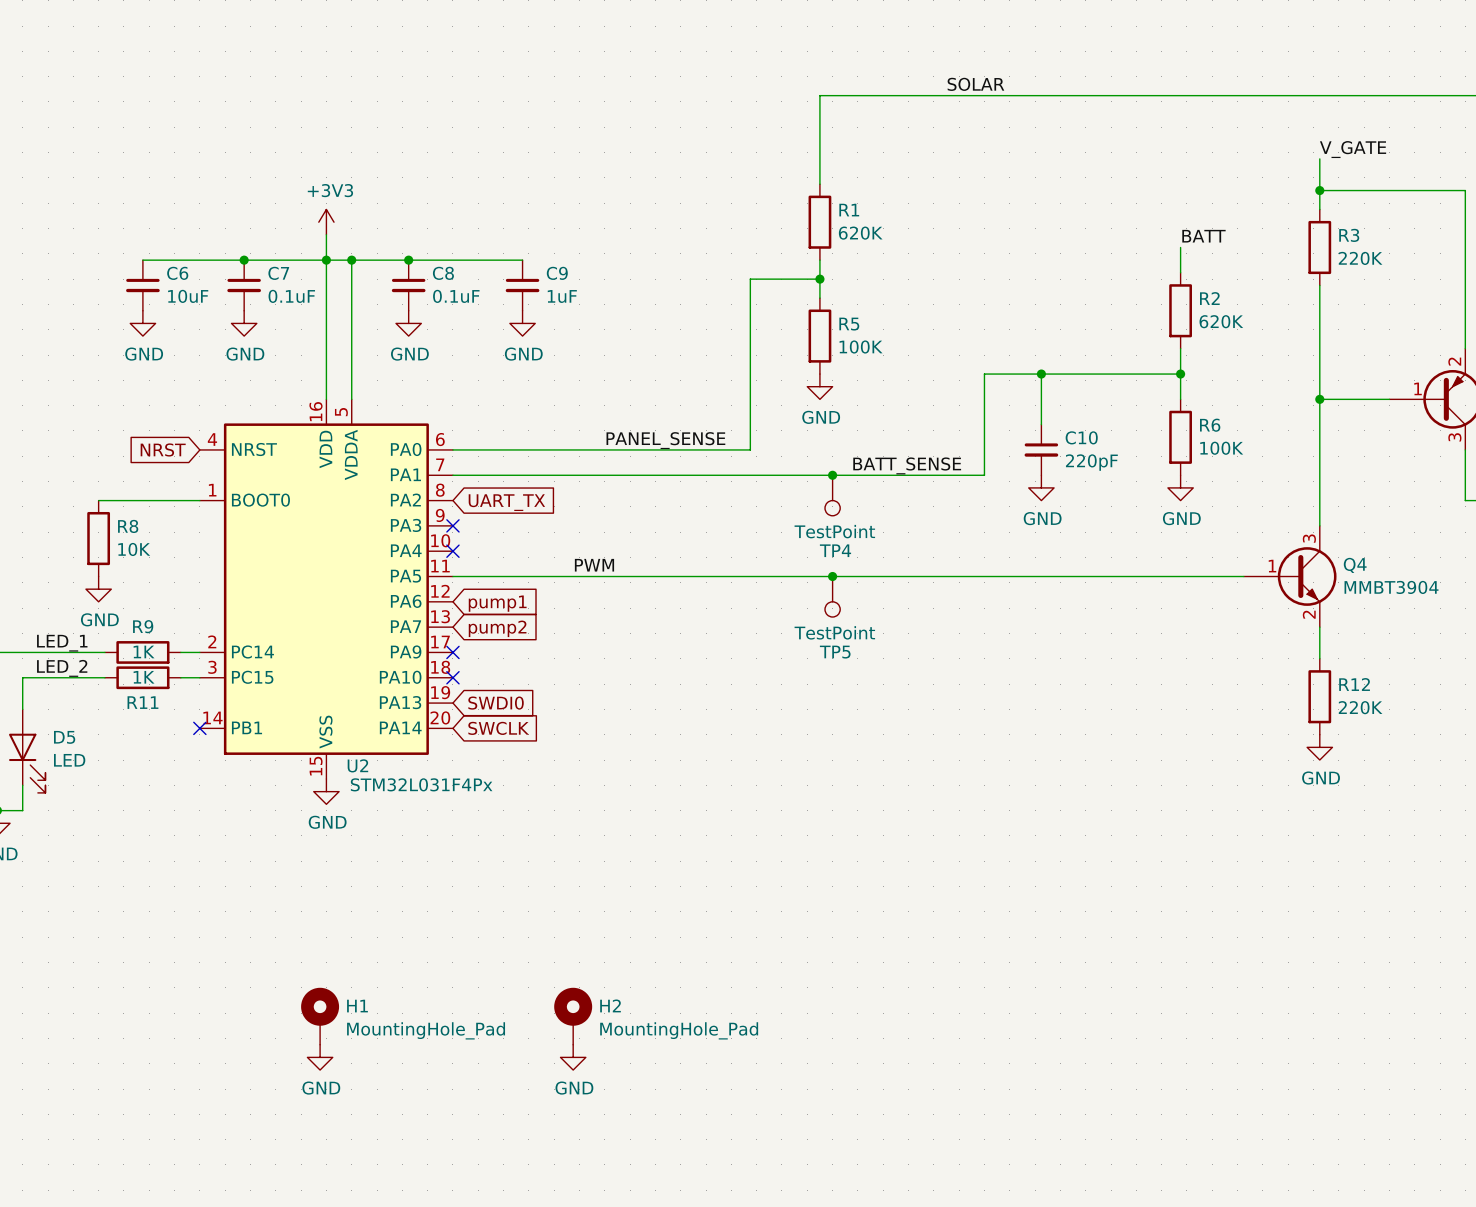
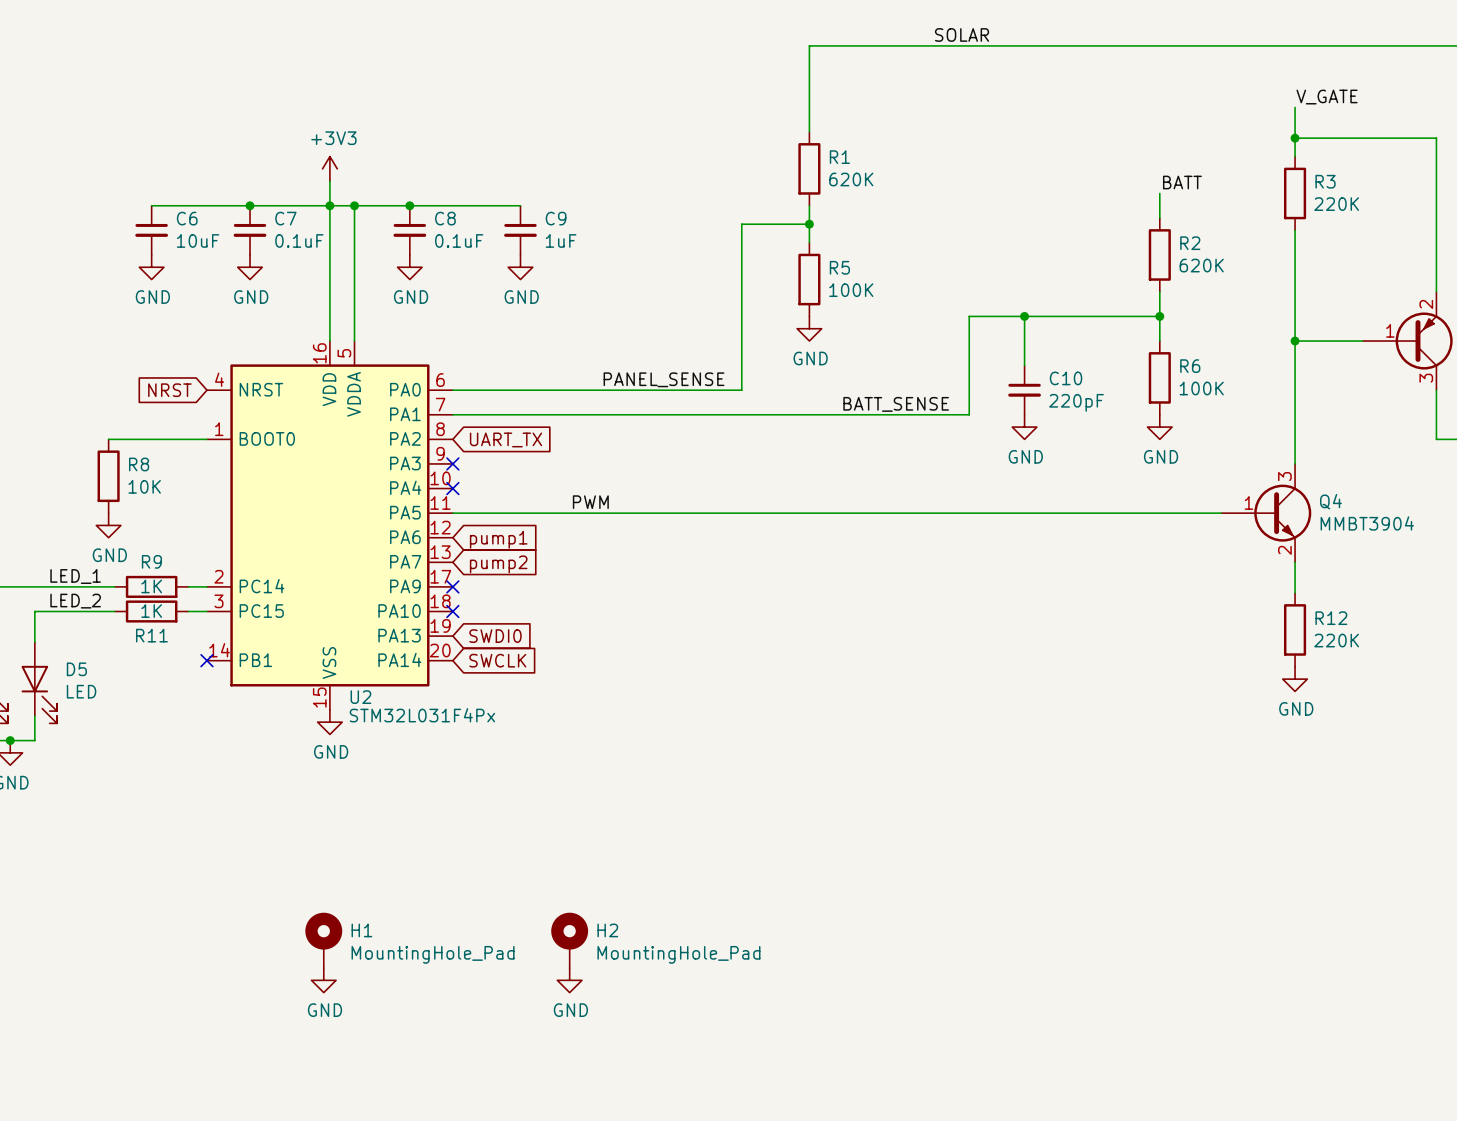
junction: (832, 475) -> none
TP4: TestPoint (832, 495) -> none
junction: (832, 576) -> none
TP5: TestPoint (832, 596) -> none

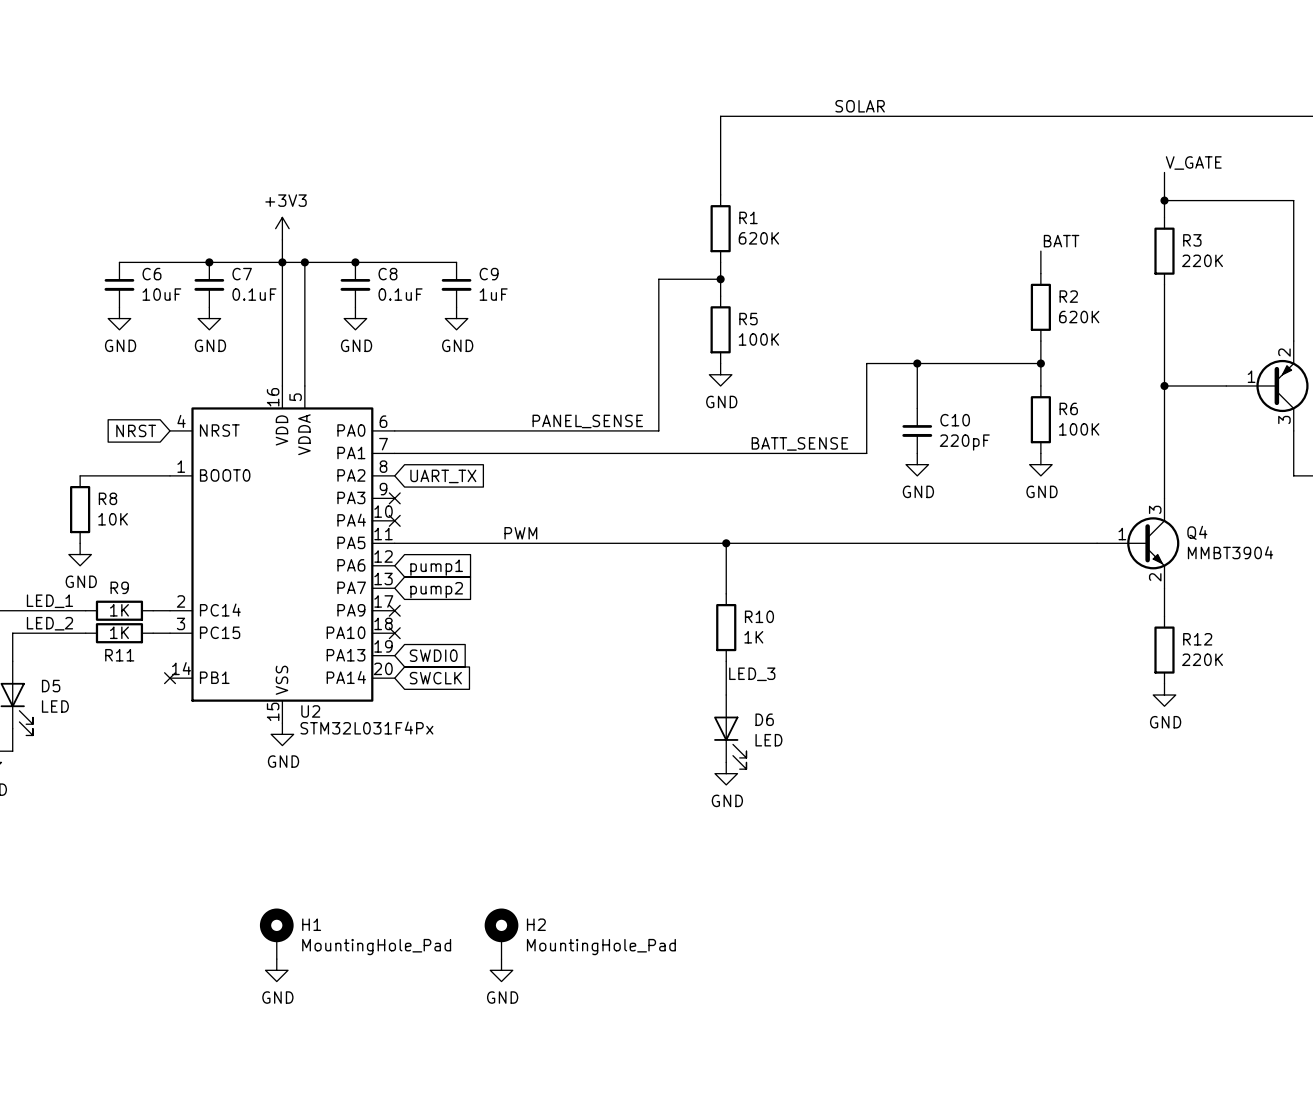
wire: none -> (726, 543) (726, 593)
junction: none -> (726, 543)
R10: none -> 1K (726, 627)
wire: none -> (726, 661) (726, 695)
label: none -> LED_3 (752, 674)
D6: none -> LED (730, 732)
power symbol: none -> GND (726, 773)

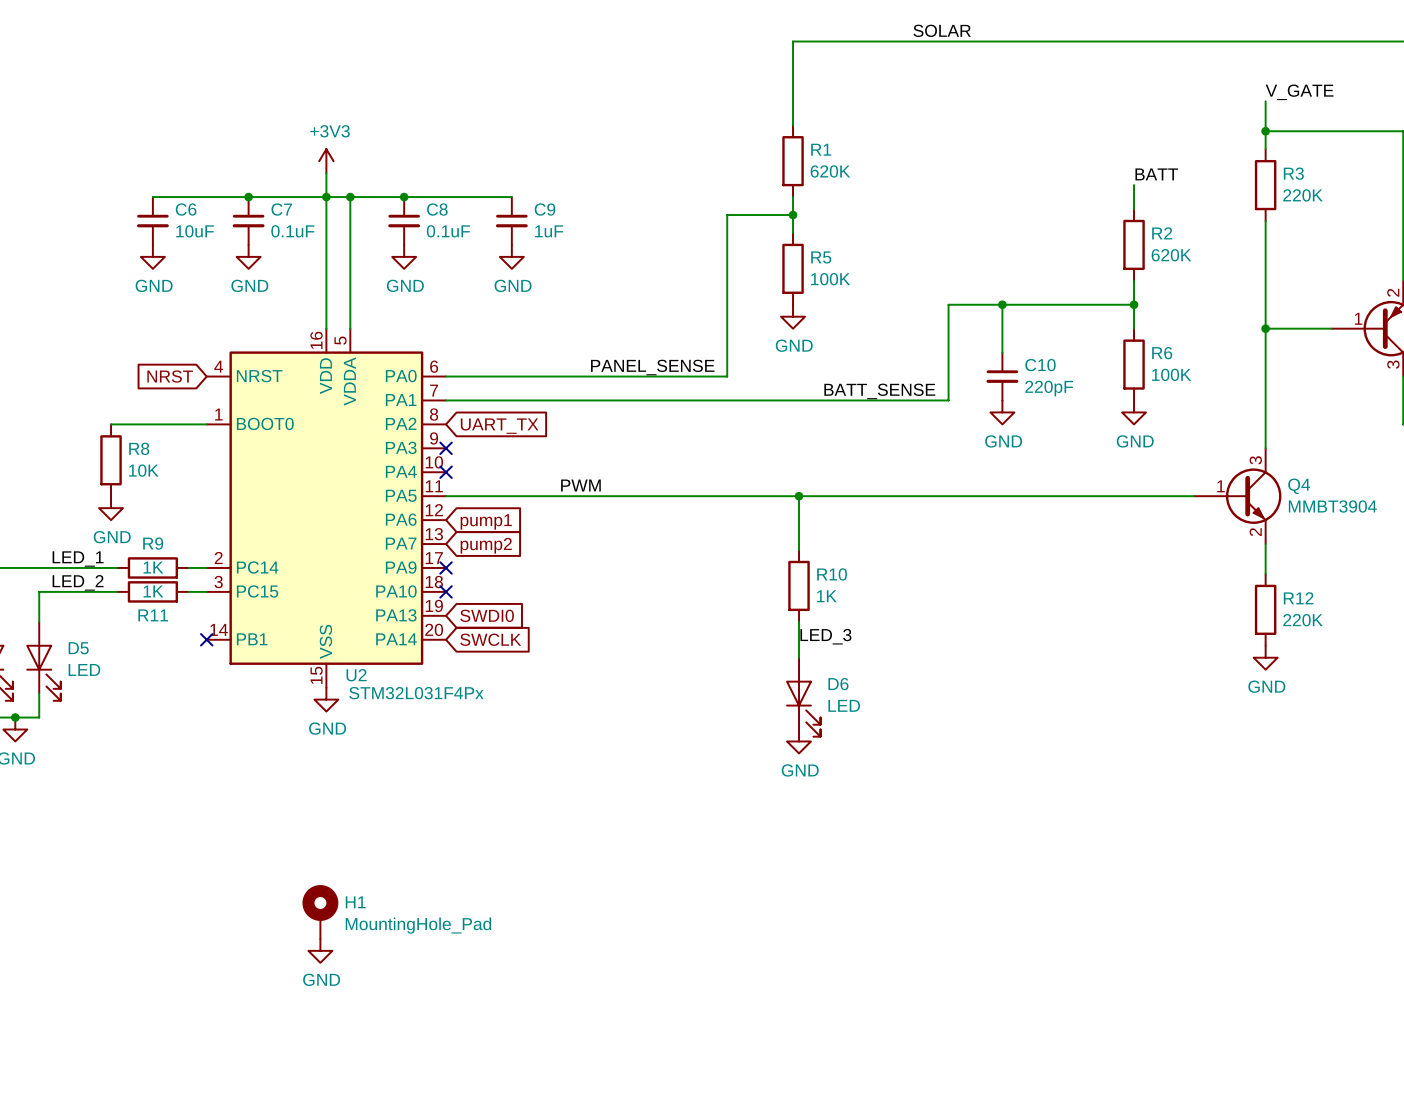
H2: MountingHole_Pad (501, 933) -> none
power symbol: GND (501, 970) -> none

